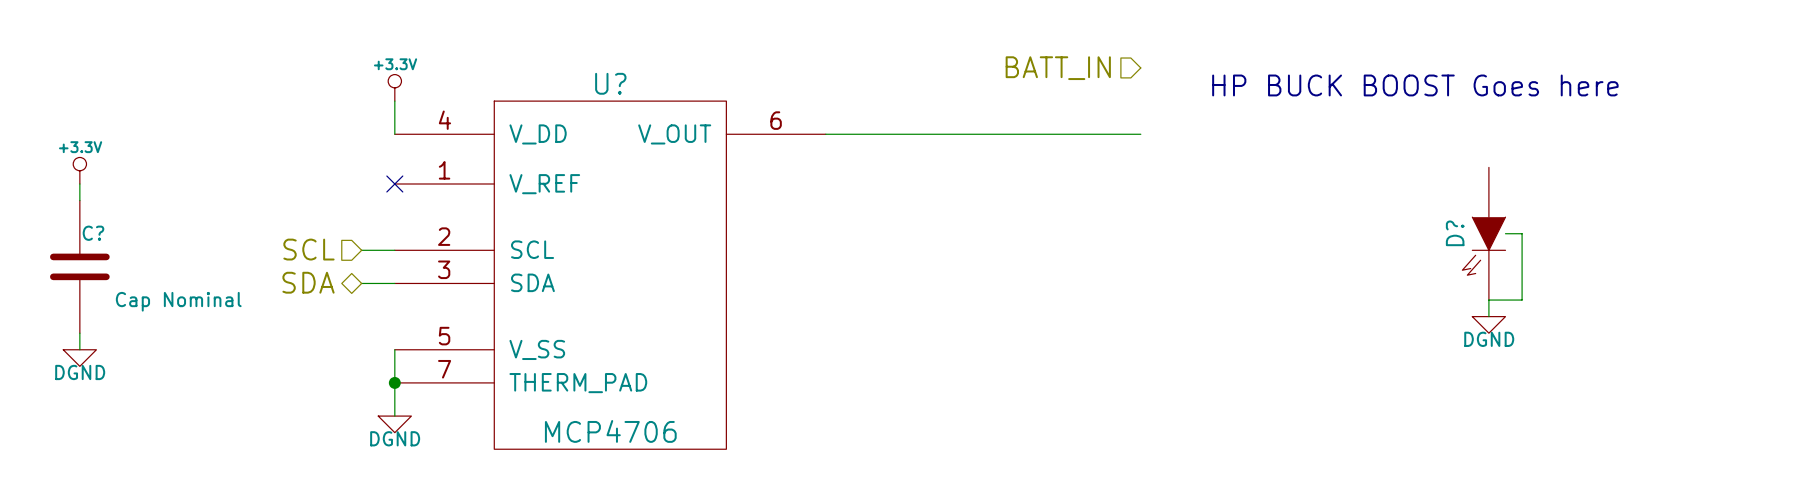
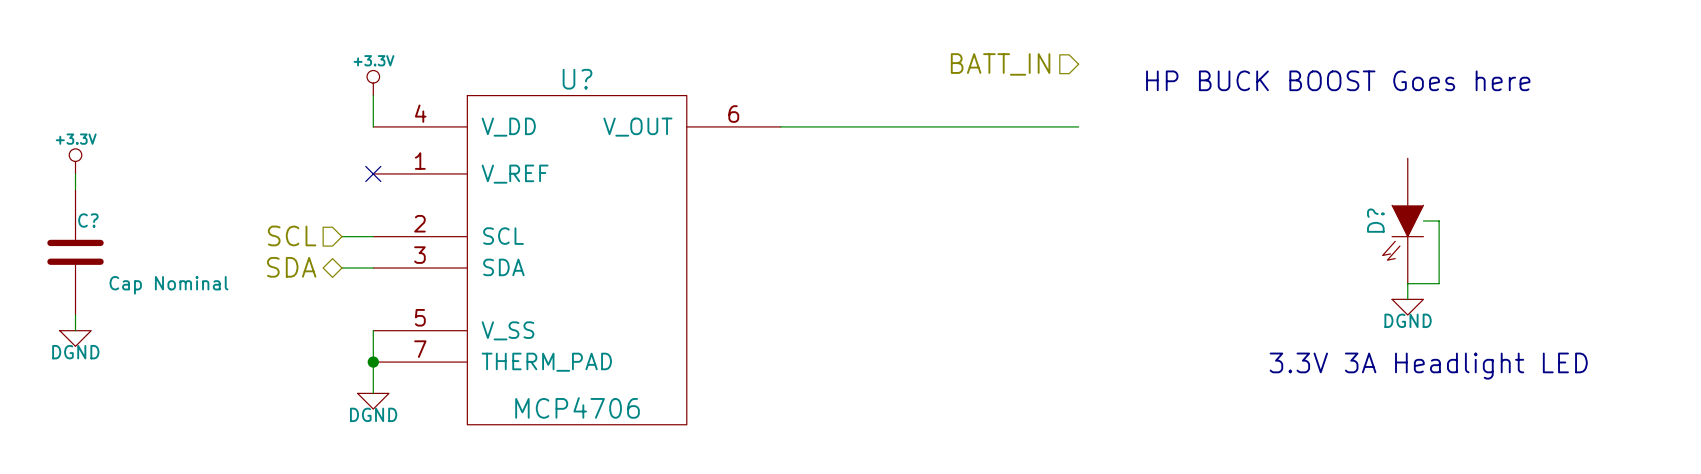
text: none -> 3.3V 3A Headlight LED (1428, 366)

